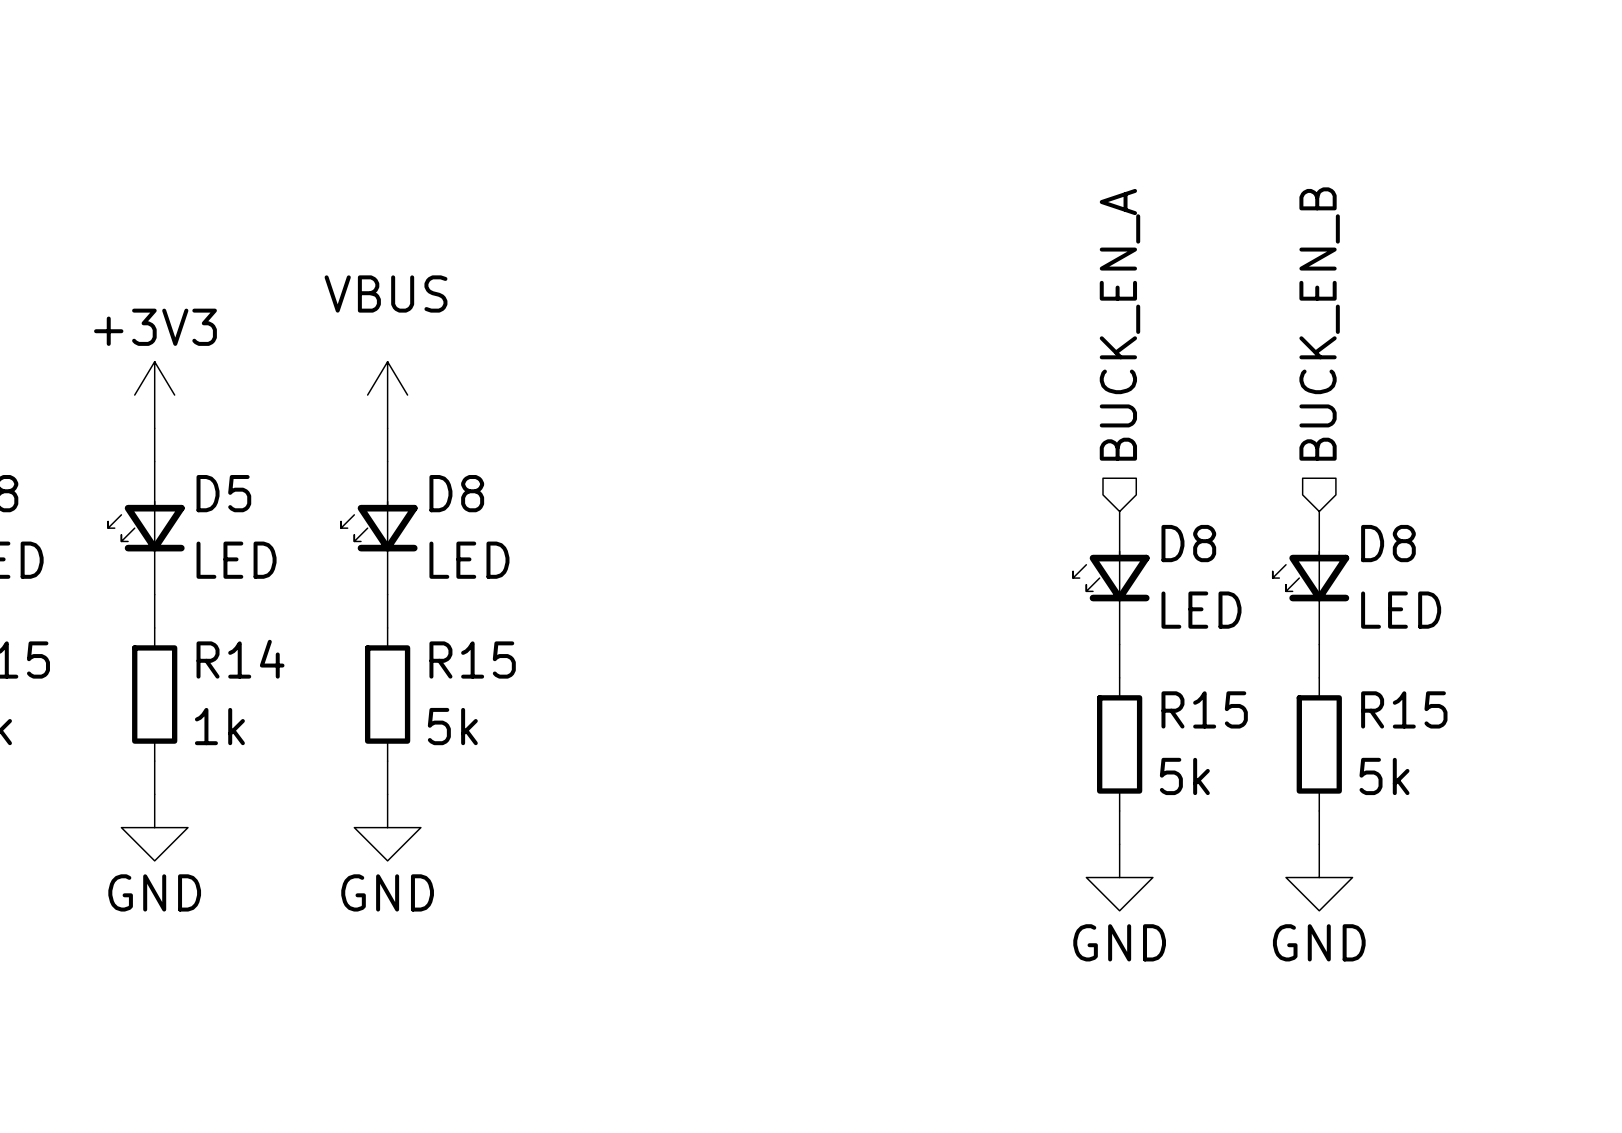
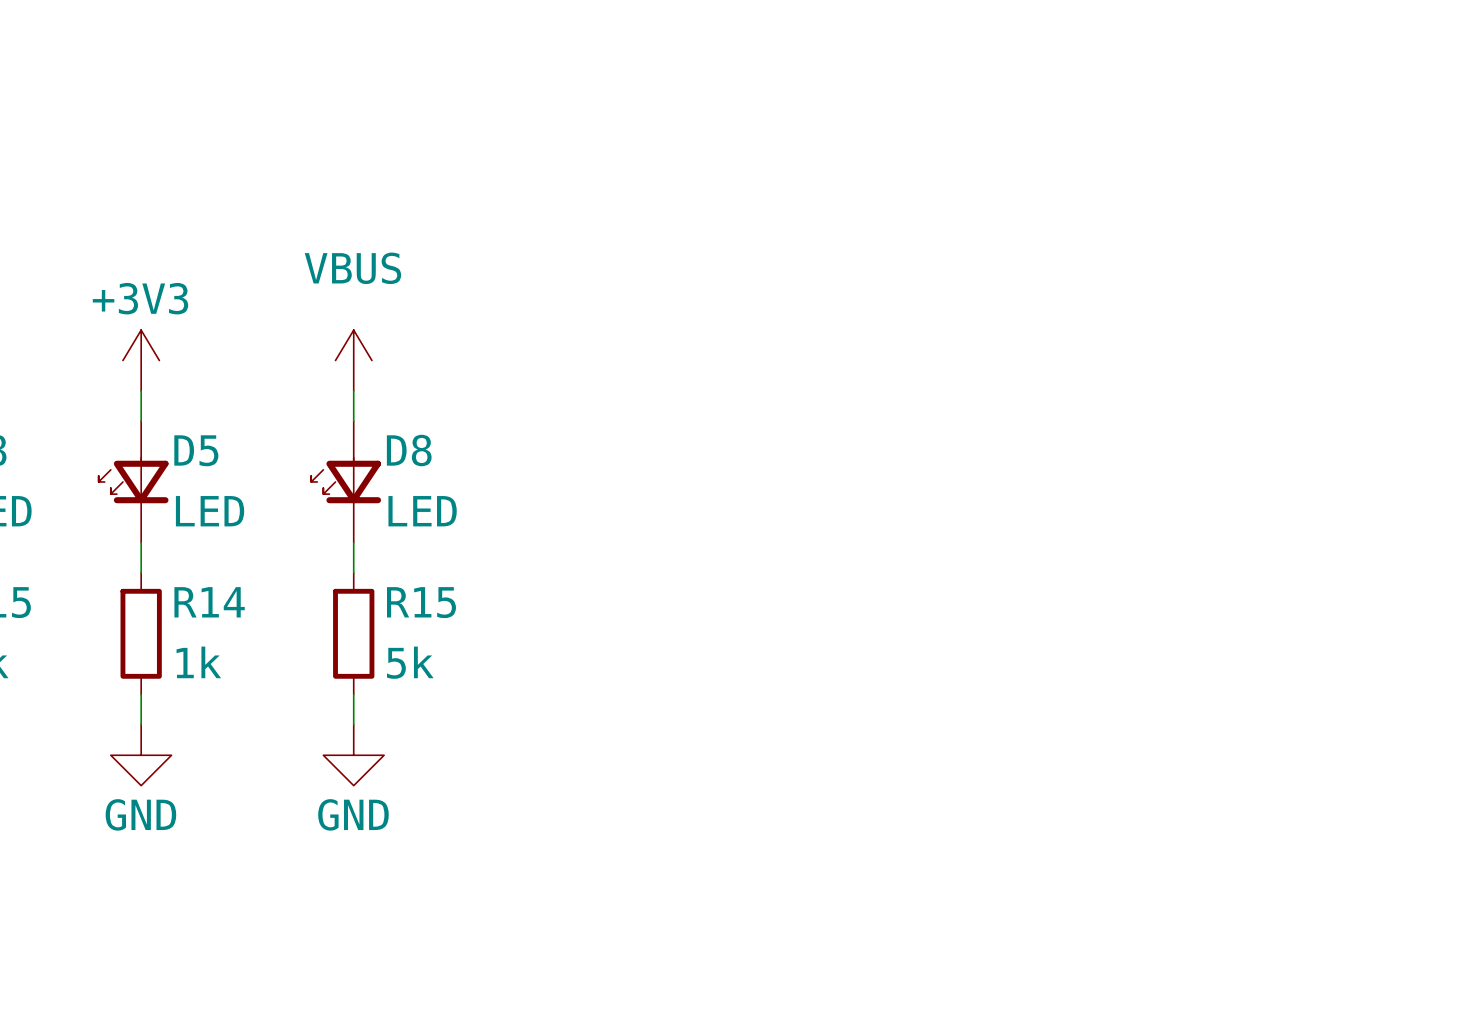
hierarchical label: BUCK_EN_A (1119, 324) -> none
hierarchical label: BUCK_EN_B (1319, 324) -> none
D8: LED (1111, 578) -> none
D8: LED (1310, 578) -> none
wire: (1119, 644) (1119, 677) -> none
wire: (1319, 644) (1319, 677) -> none
R15: 5k (1119, 744) -> none
R15: 5k (1319, 744) -> none
wire: (1119, 810) (1119, 844) -> none
wire: (1319, 810) (1319, 844) -> none
power symbol: GND (1119, 877) -> none
power symbol: GND (1319, 877) -> none

